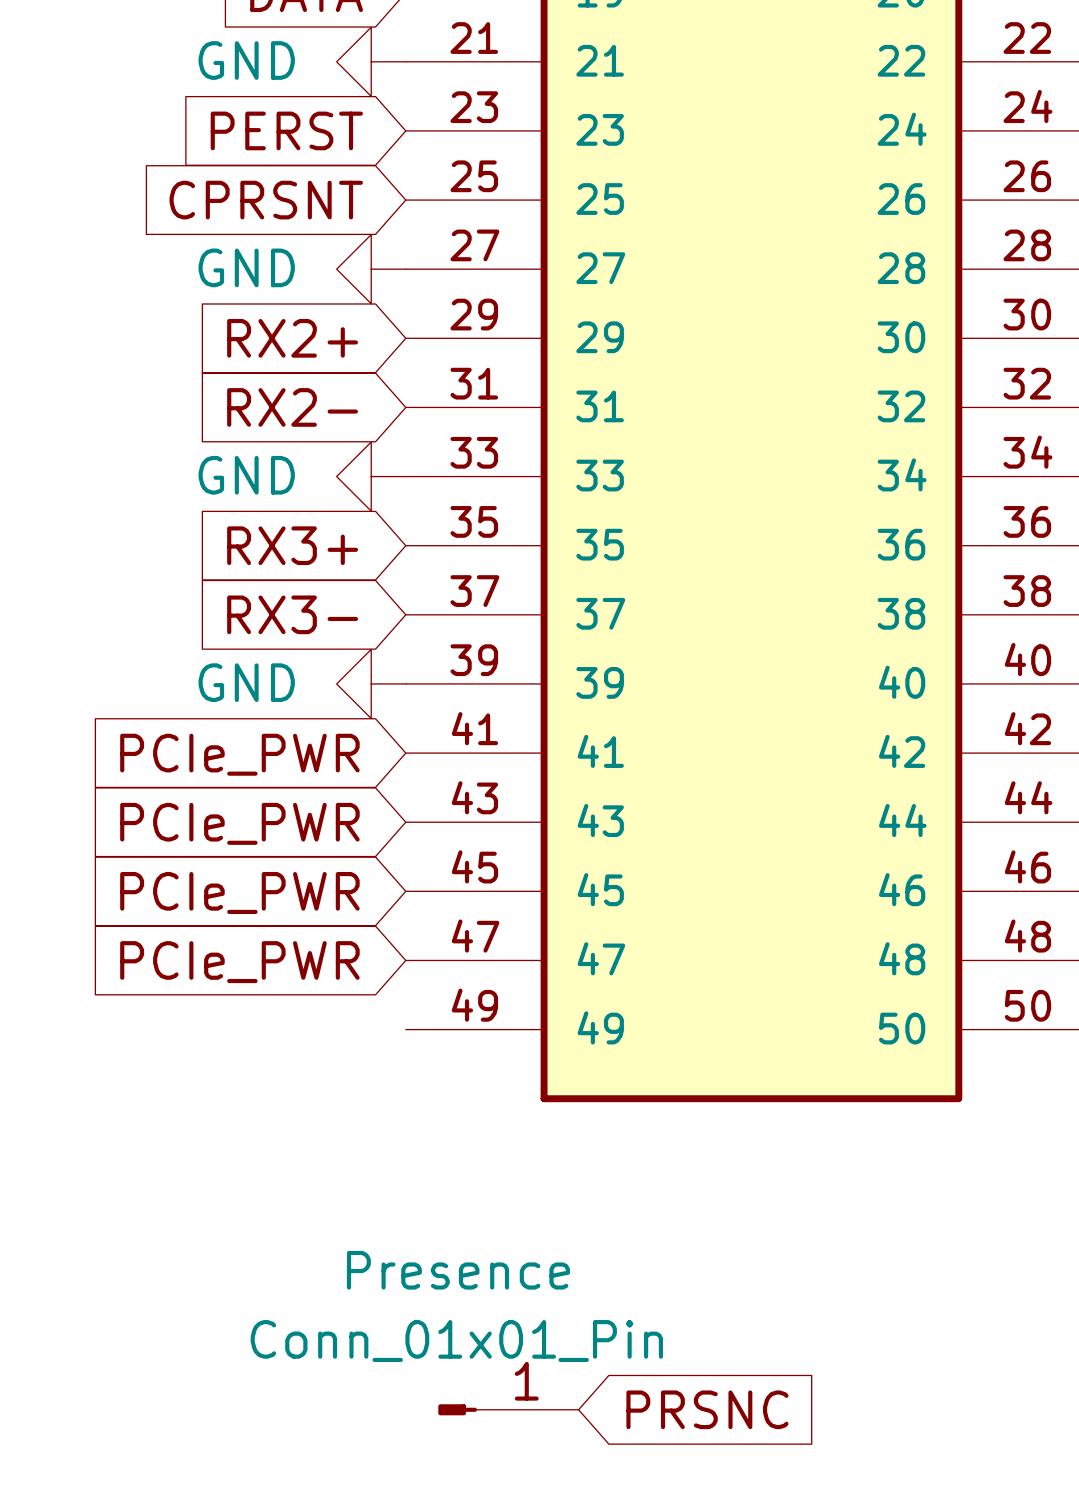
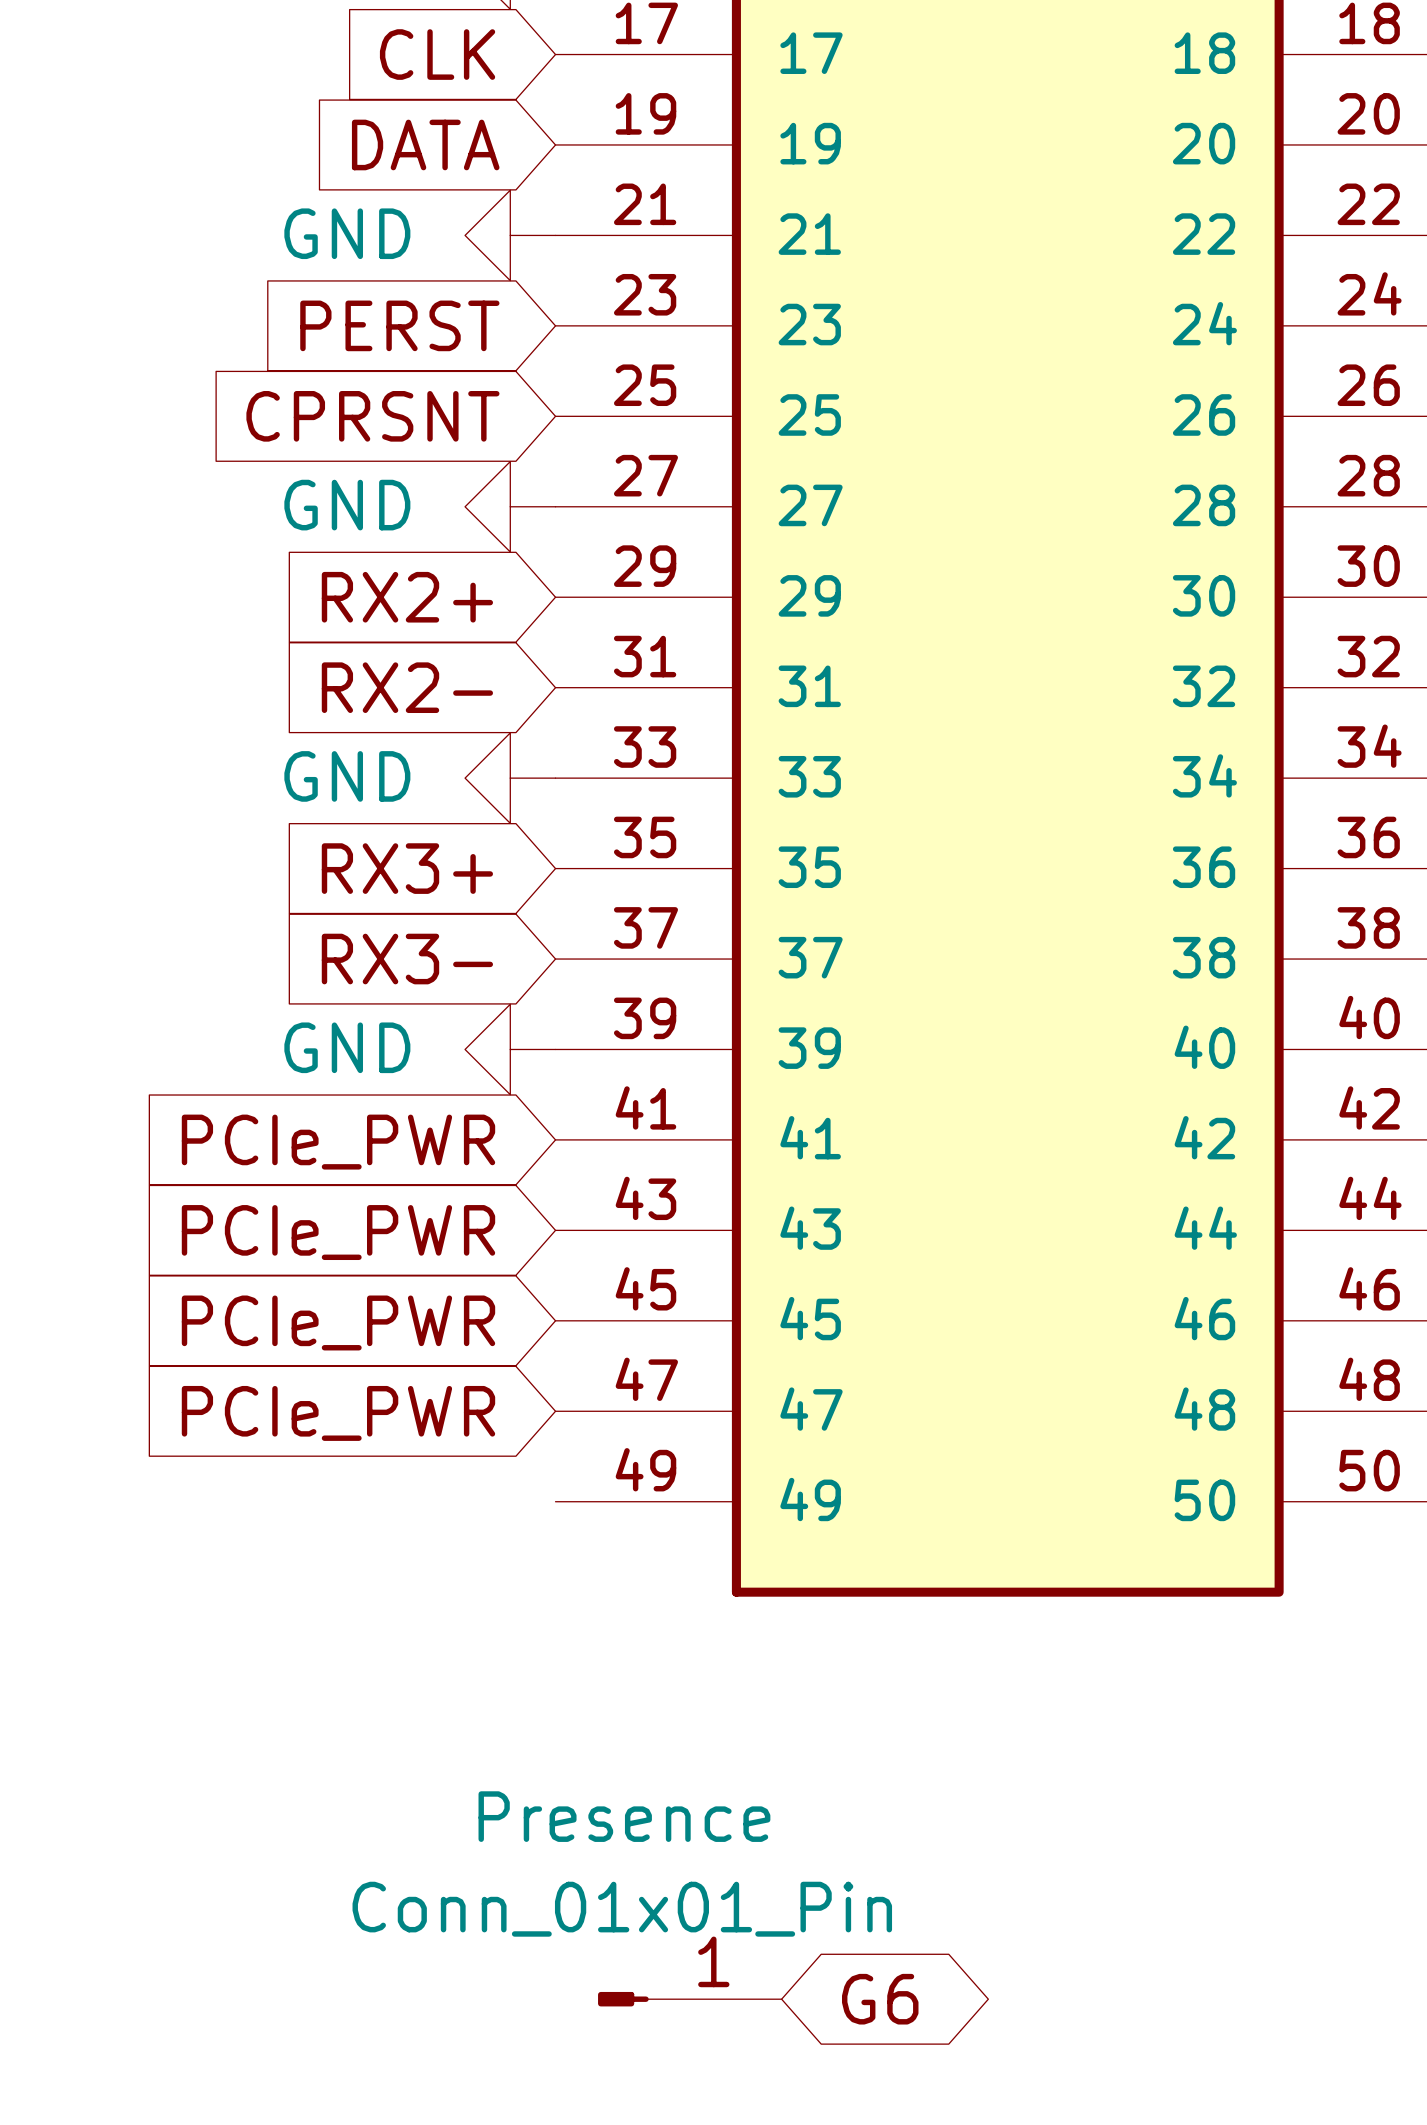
global label shape: input (707, 1409) -> bidirectional (880, 1999)
global label: PRSNC (707, 1409) -> G6 (880, 1999)

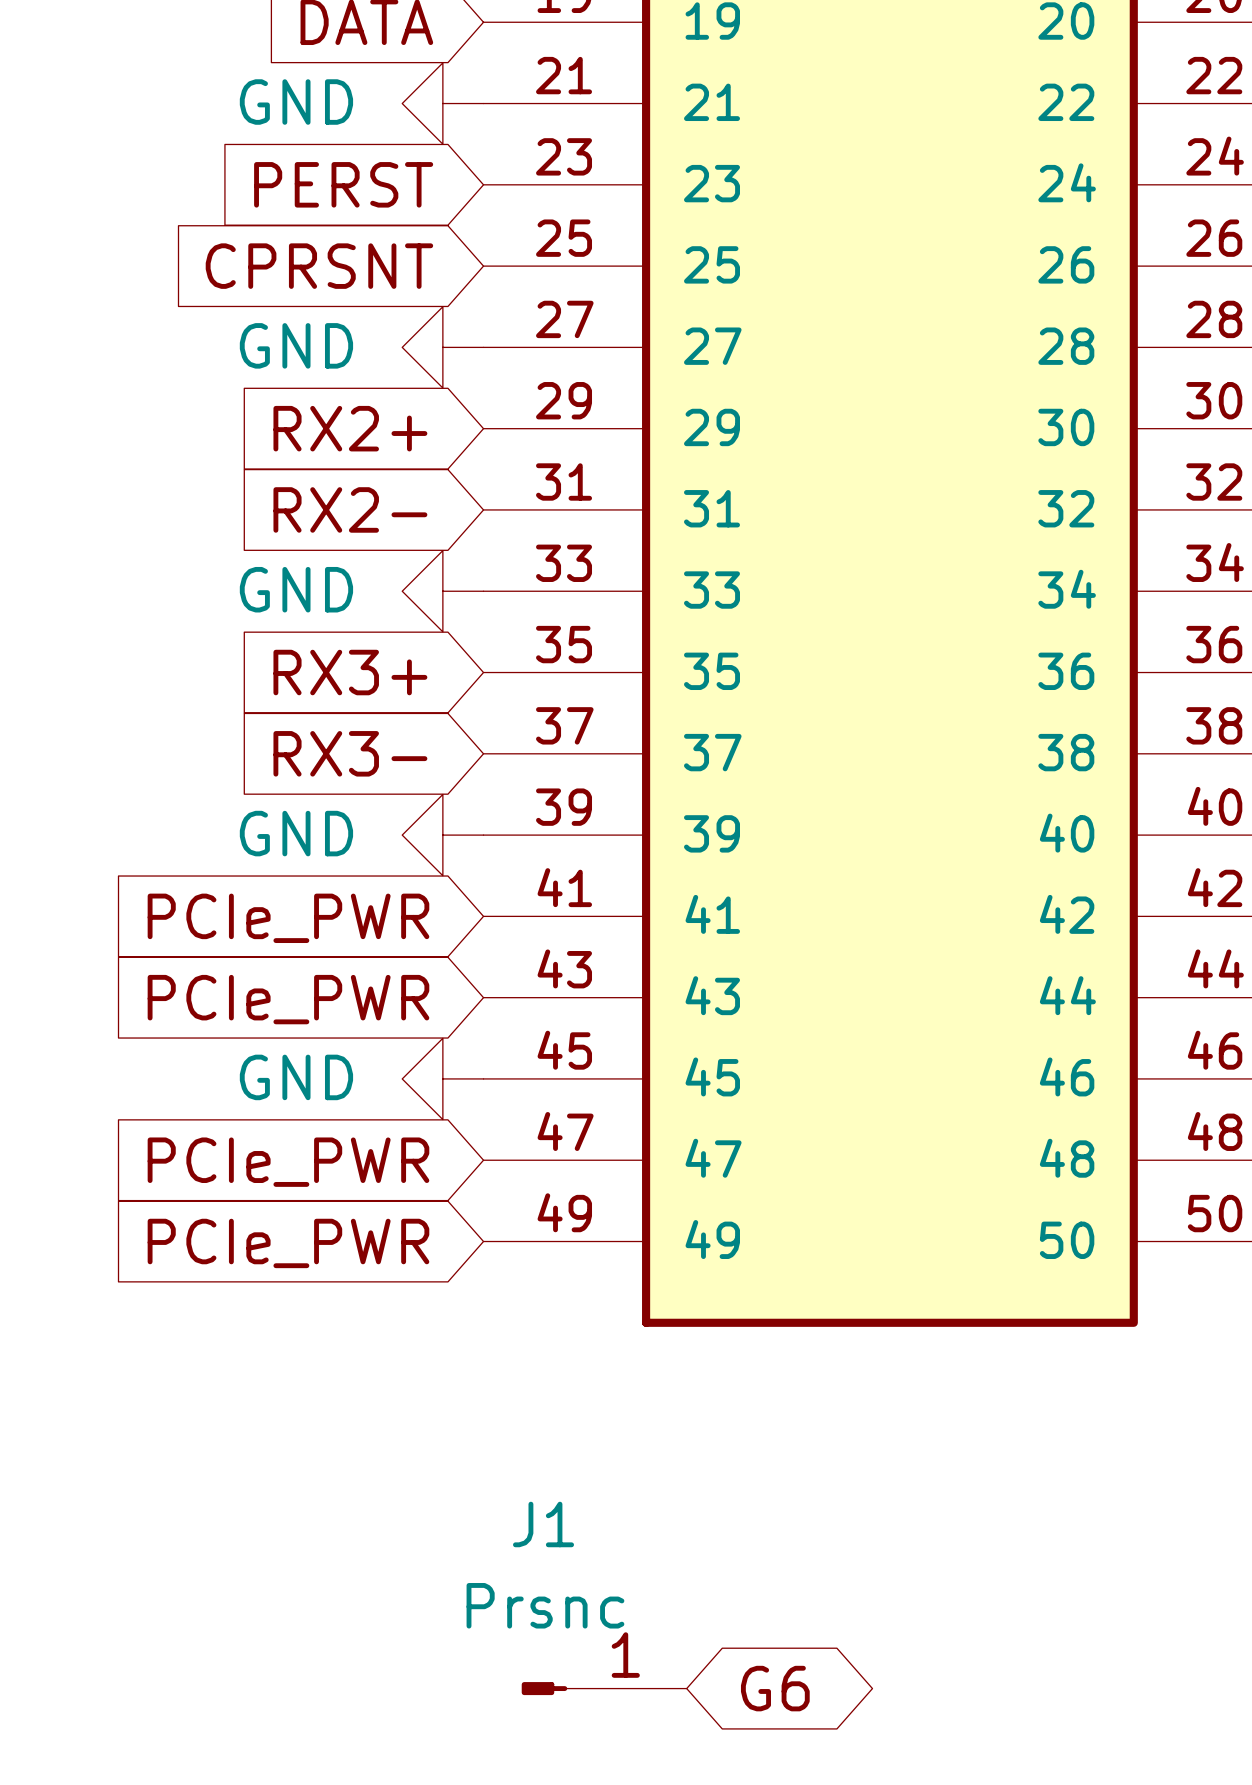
power symbol: none -> GND (442, 1078)
global label position: PCIe_PWR (338, 1322) -> PCIe_PWR (288, 1243)
Presence name: Presence (624, 1816) -> J1 (543, 1524)
Presence value: Conn_01x01_Pin (622, 1909) -> Prsnc (545, 1605)

